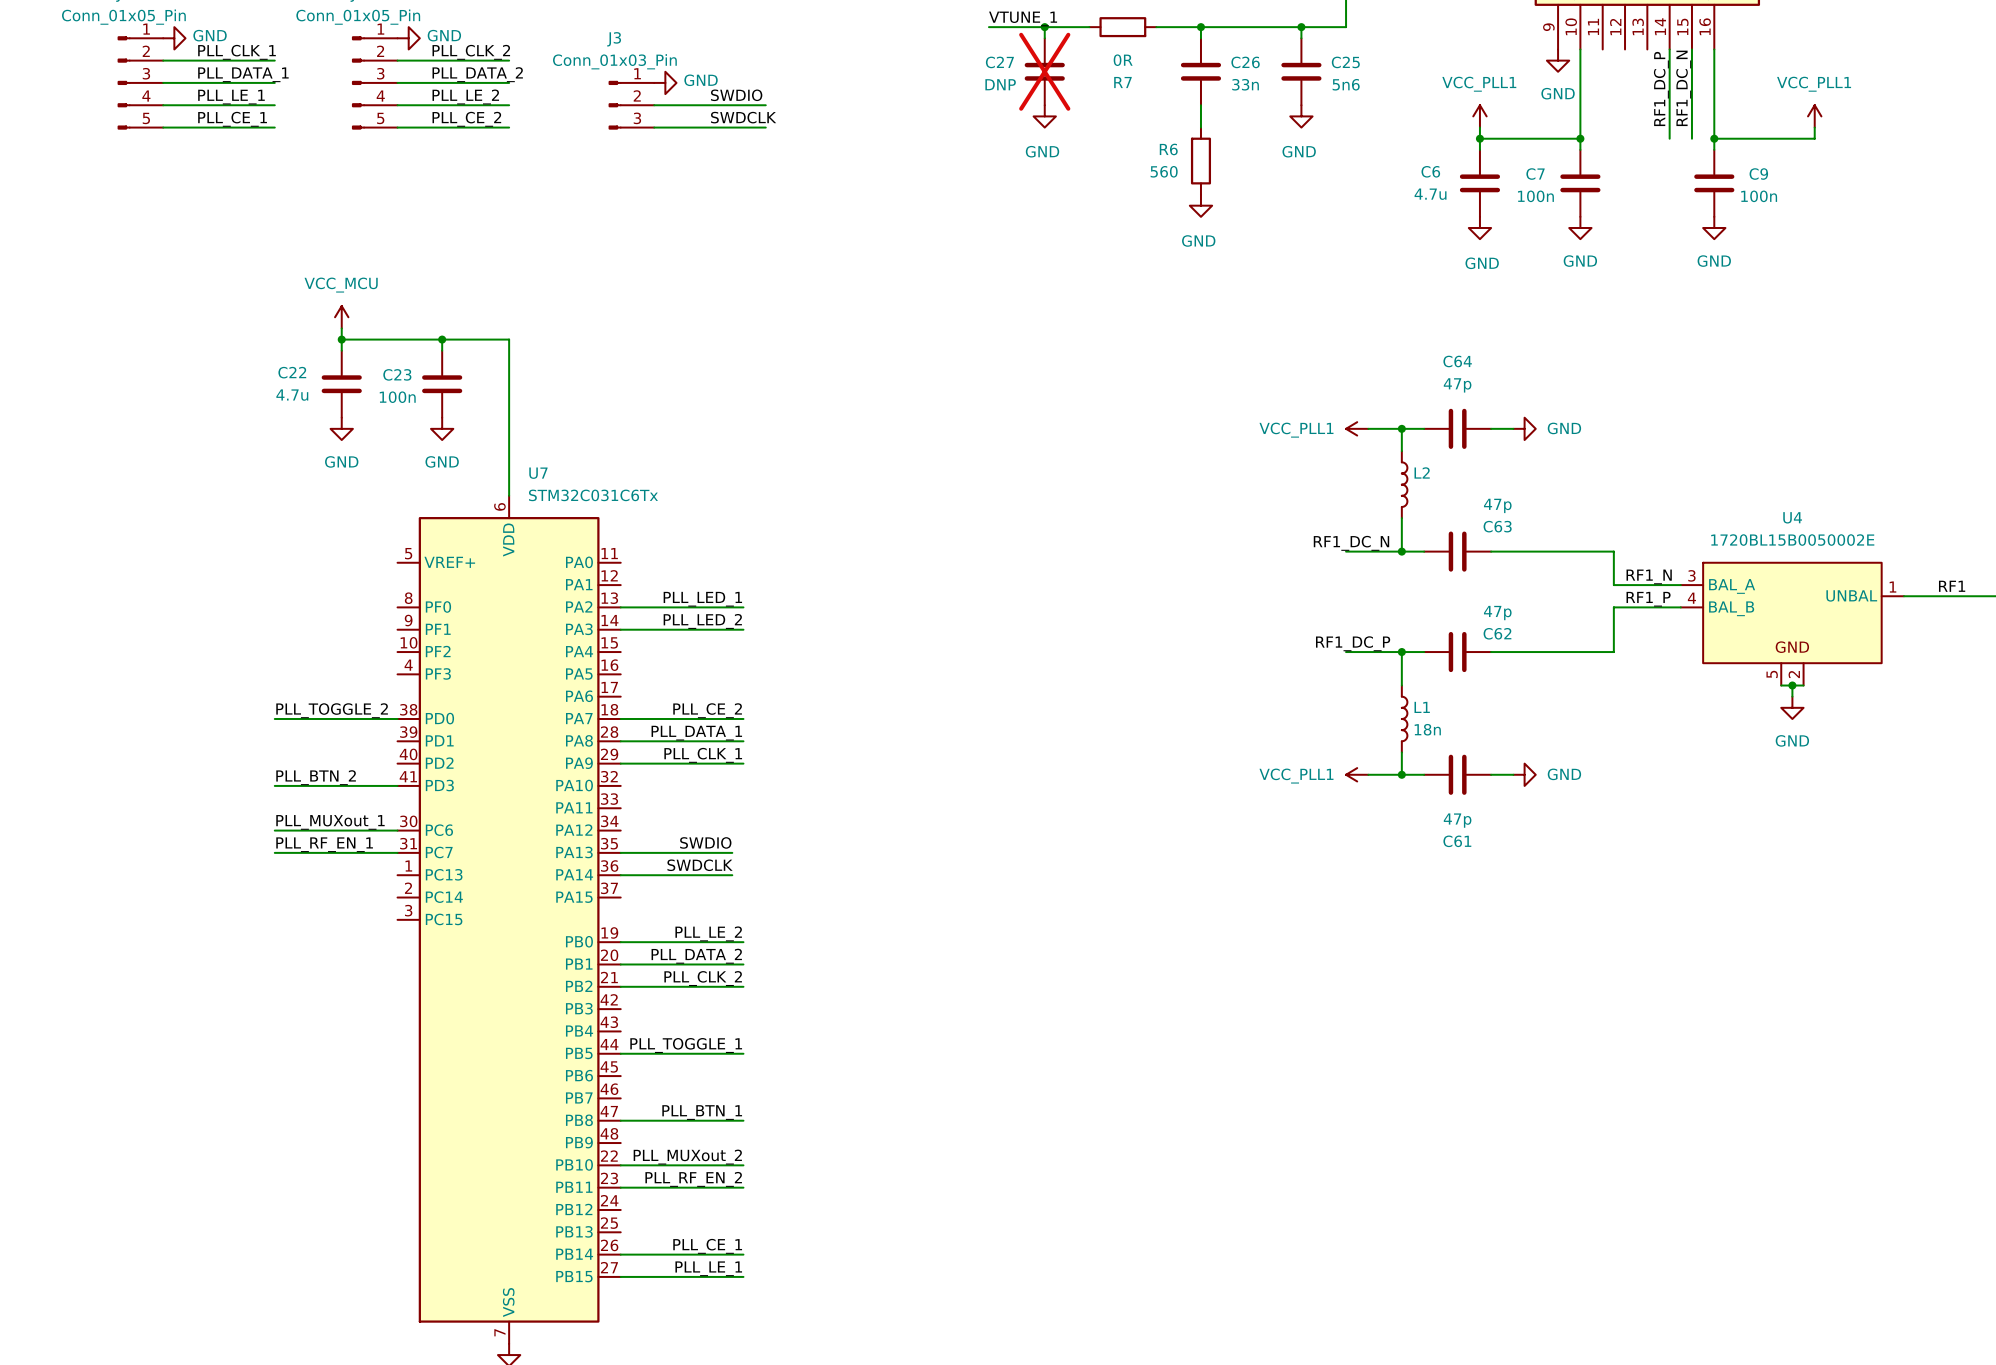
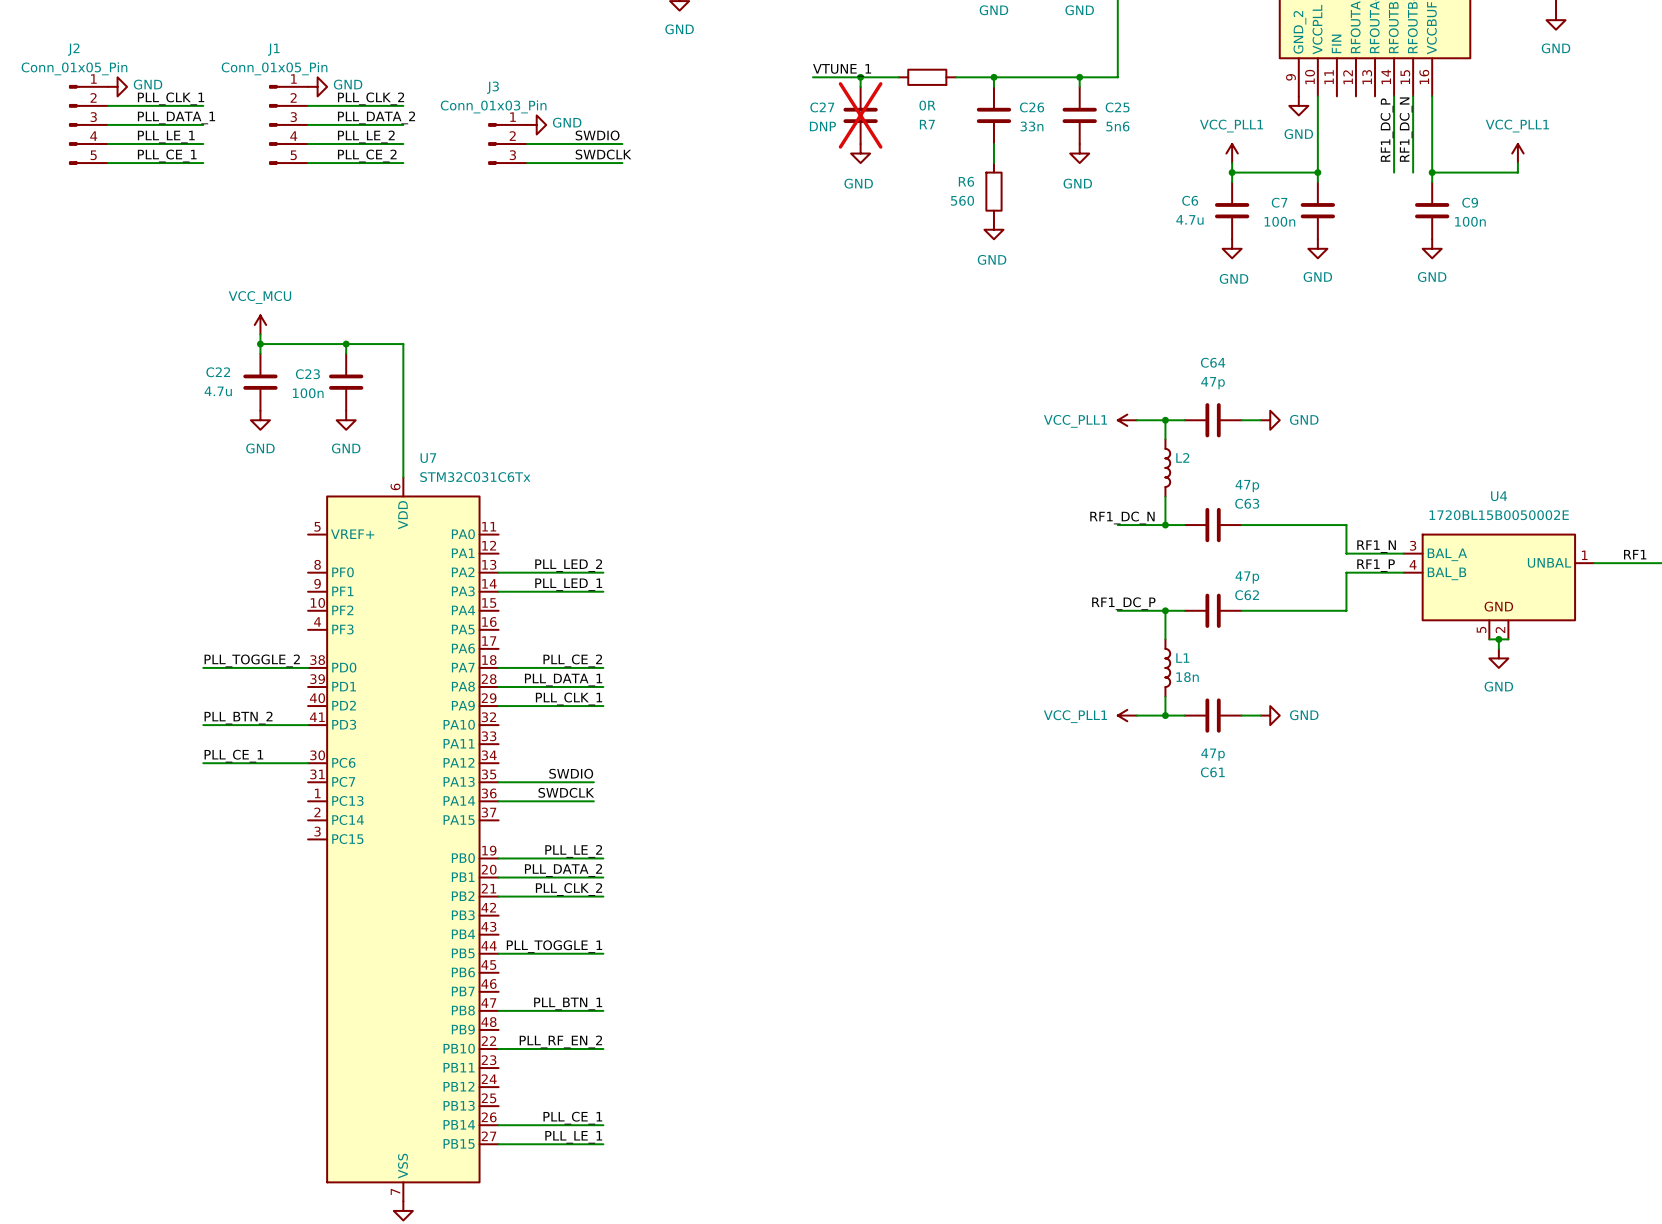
label: PLL_LED_1 (702, 599) -> PLL_LED_2 (568, 565)
label: PLL_LED_2 (702, 621) -> PLL_LED_1 (568, 584)
label: PLL_MUXout_1 (330, 822) -> PLL_CE_1 (233, 756)
label: PLL_RF_EN_1 (324, 844) -> none
wire: (274, 852) (397, 852) -> none
label: PLL_MUXout_2 (687, 1157) -> PLL_RF_EN_2 (560, 1041)
label: PLL_RF_EN_2 (693, 1179) -> none
wire: (620, 1187) (743, 1187) -> none

